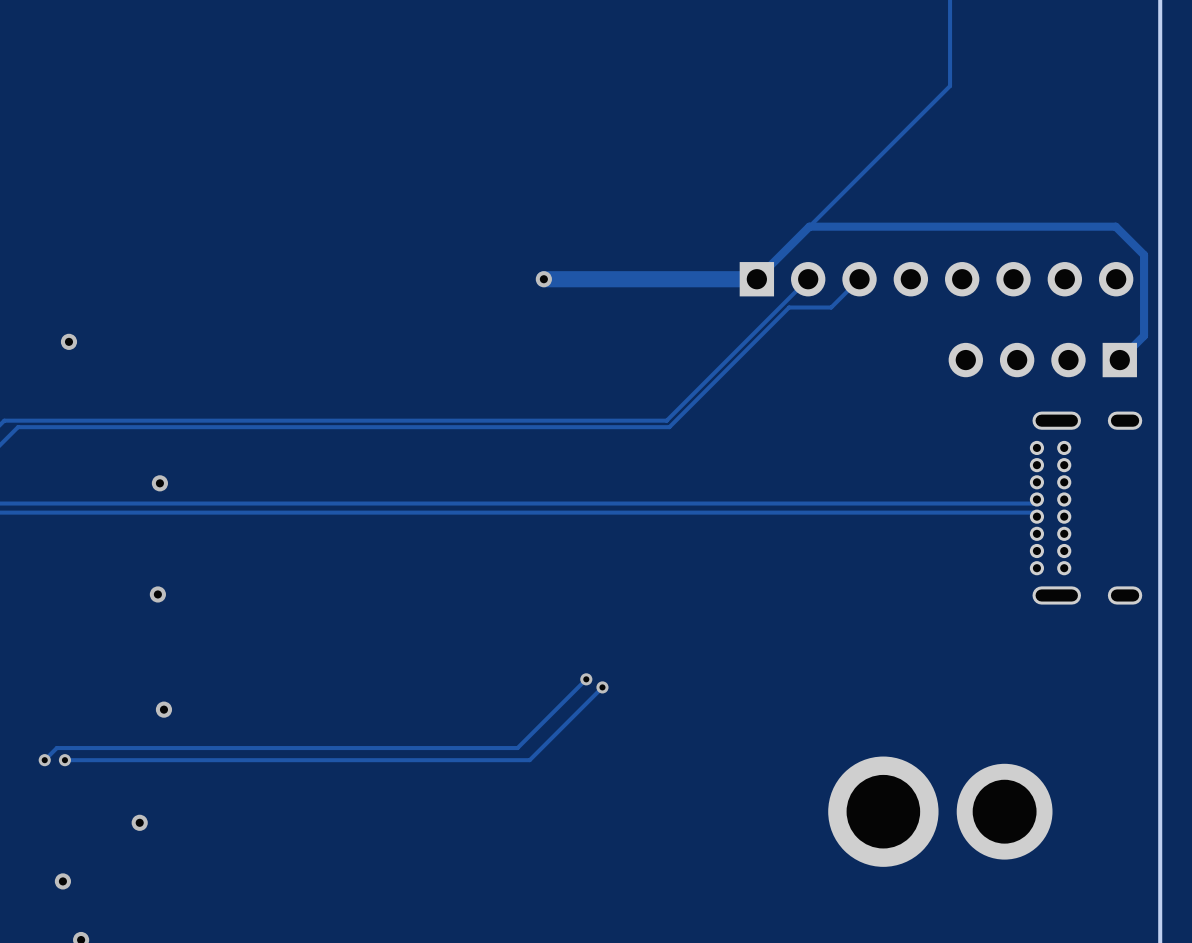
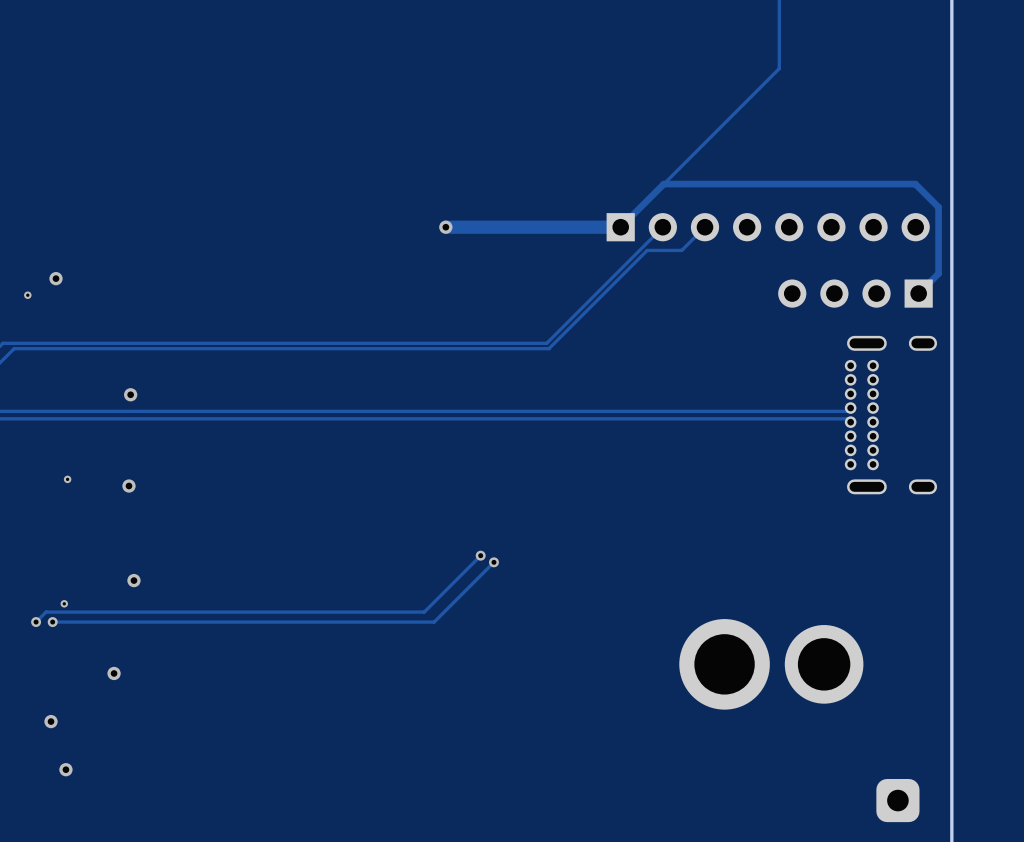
via: none -> (27, 295)
via: none -> (67, 479)
via: none -> (64, 603)

